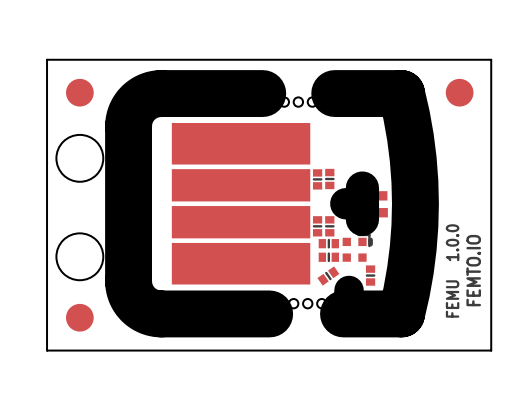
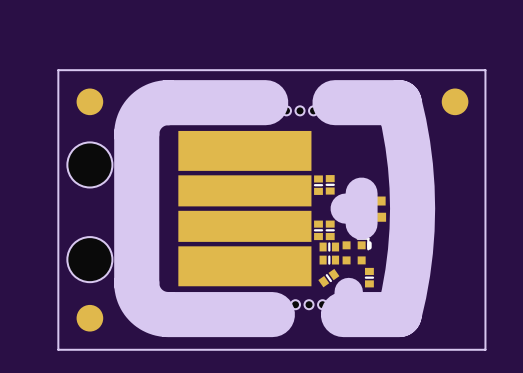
text: 1.0.0 (452, 242) -> none
text: FEMTO.IO (473, 270) -> none
text: FEMU (452, 298) -> none

